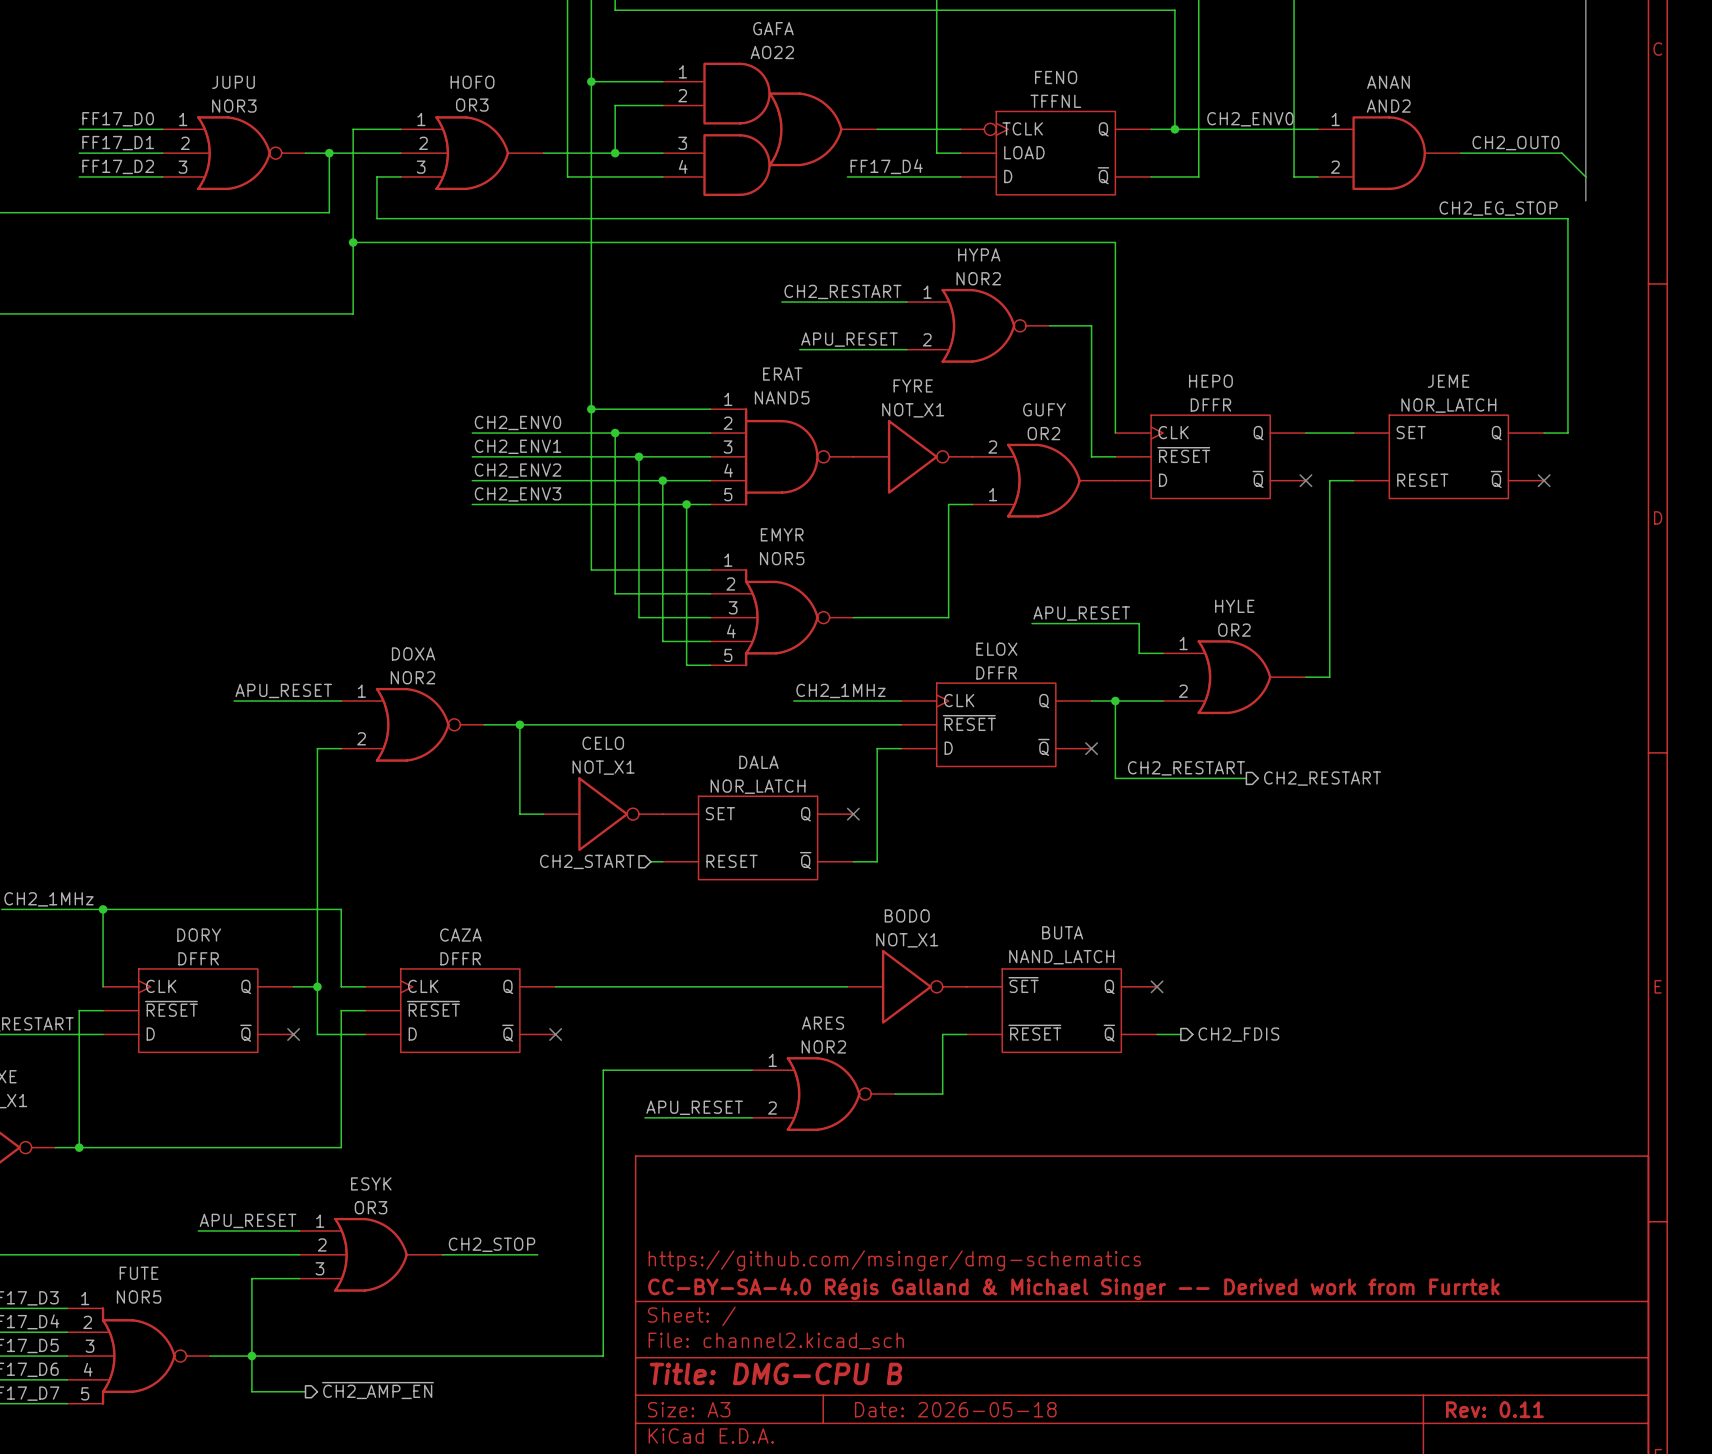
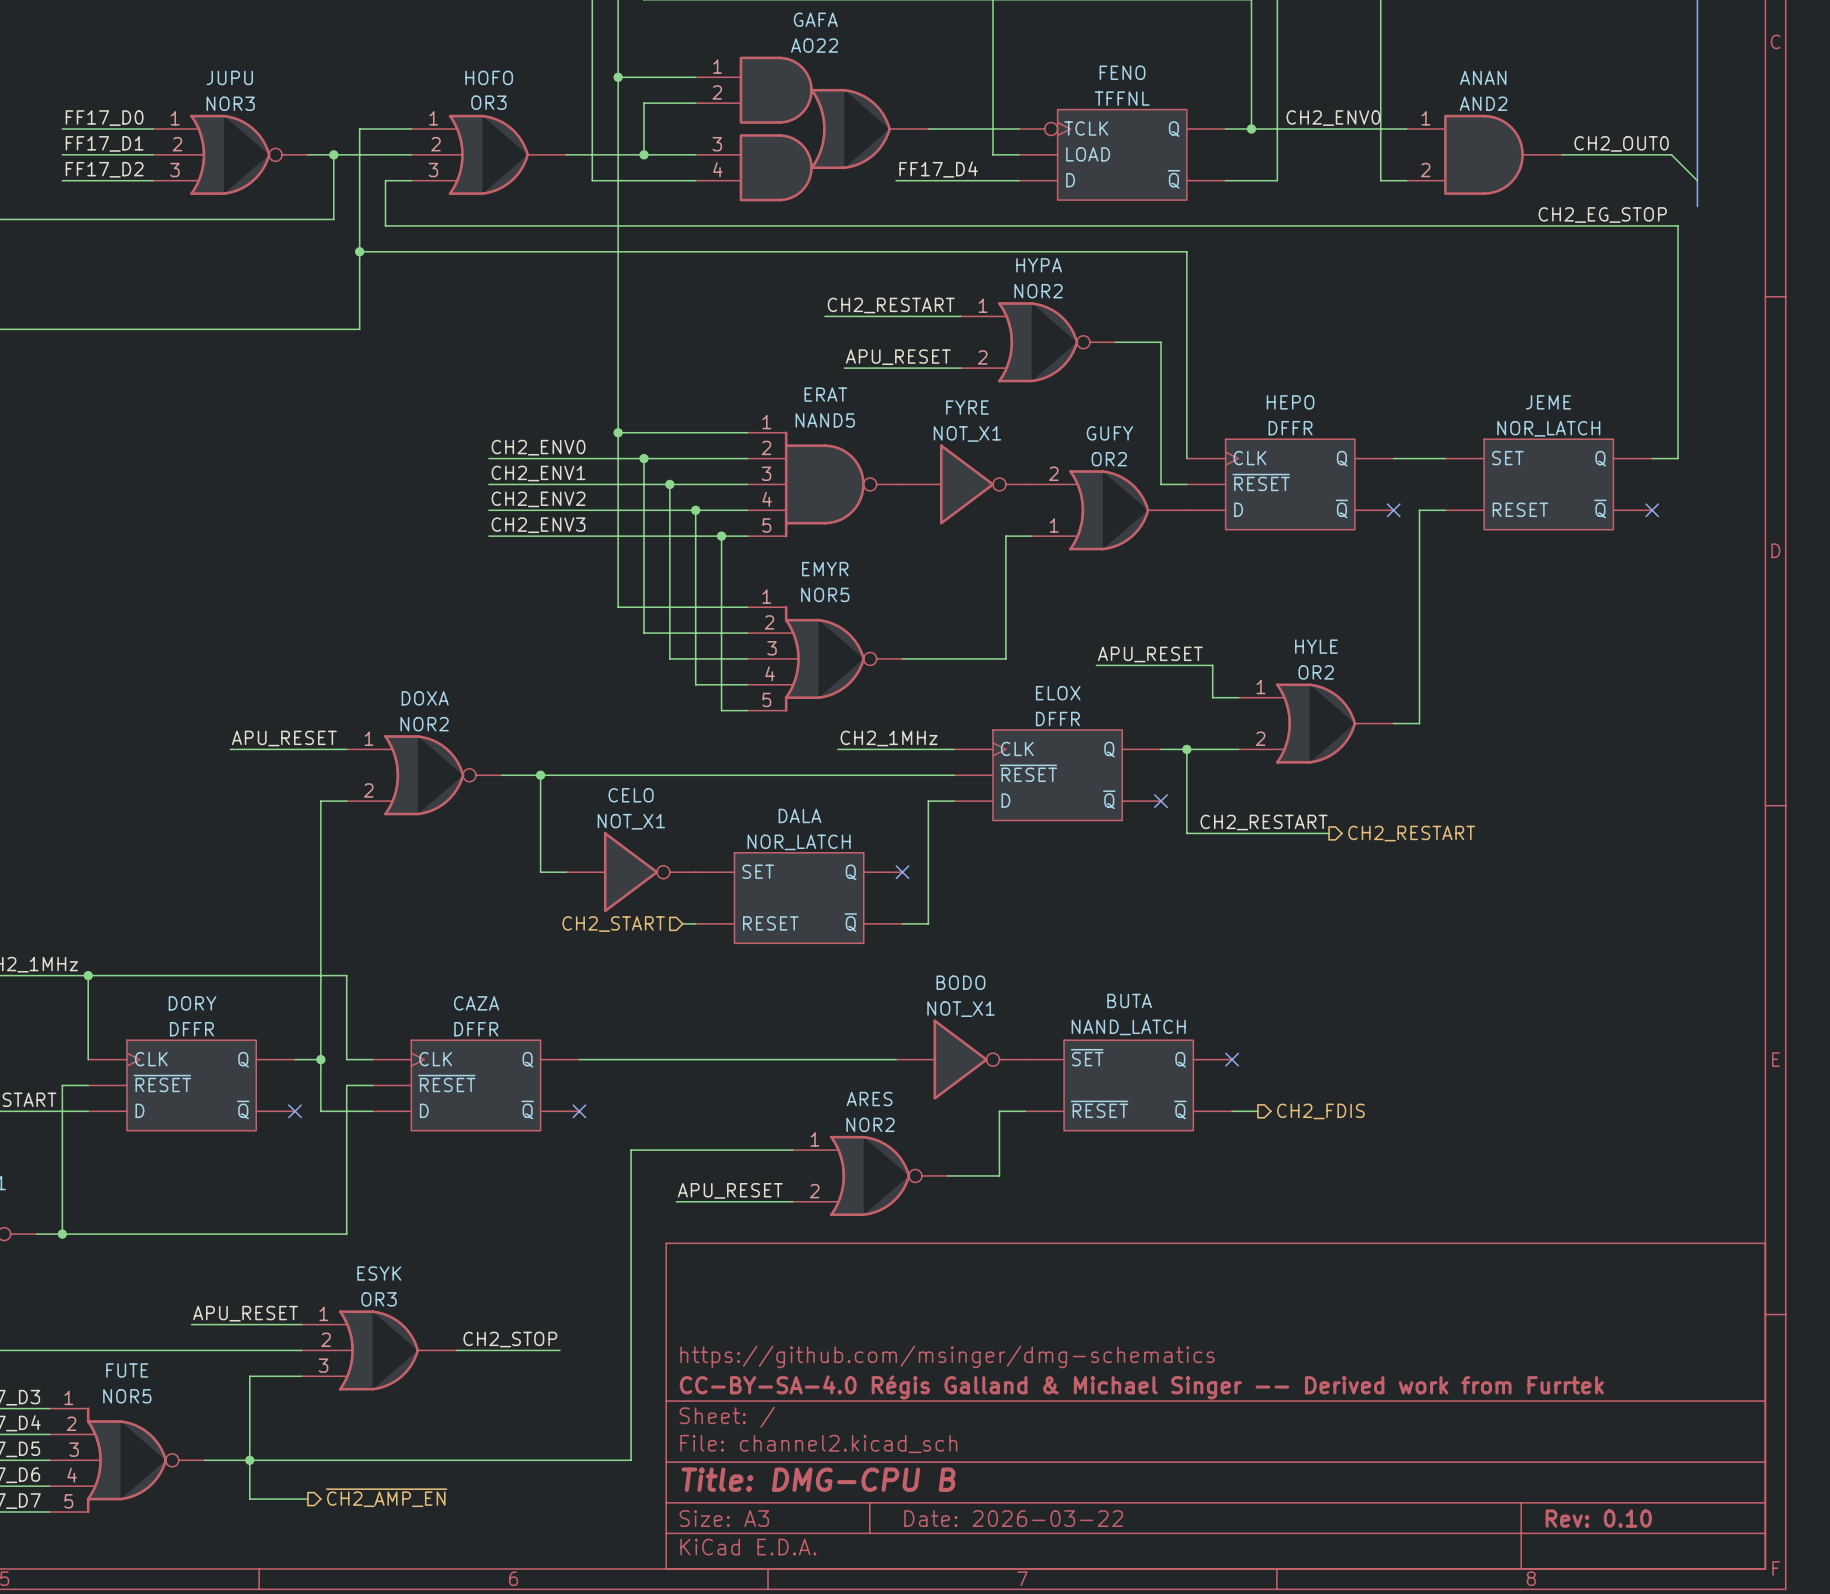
title block: Date: 2026-05-18 (955, 1409) -> Date: 2026-03-22 (1013, 1518)
title block: Rev: 0.11 (1494, 1409) -> Rev: 0.10 (1598, 1518)

